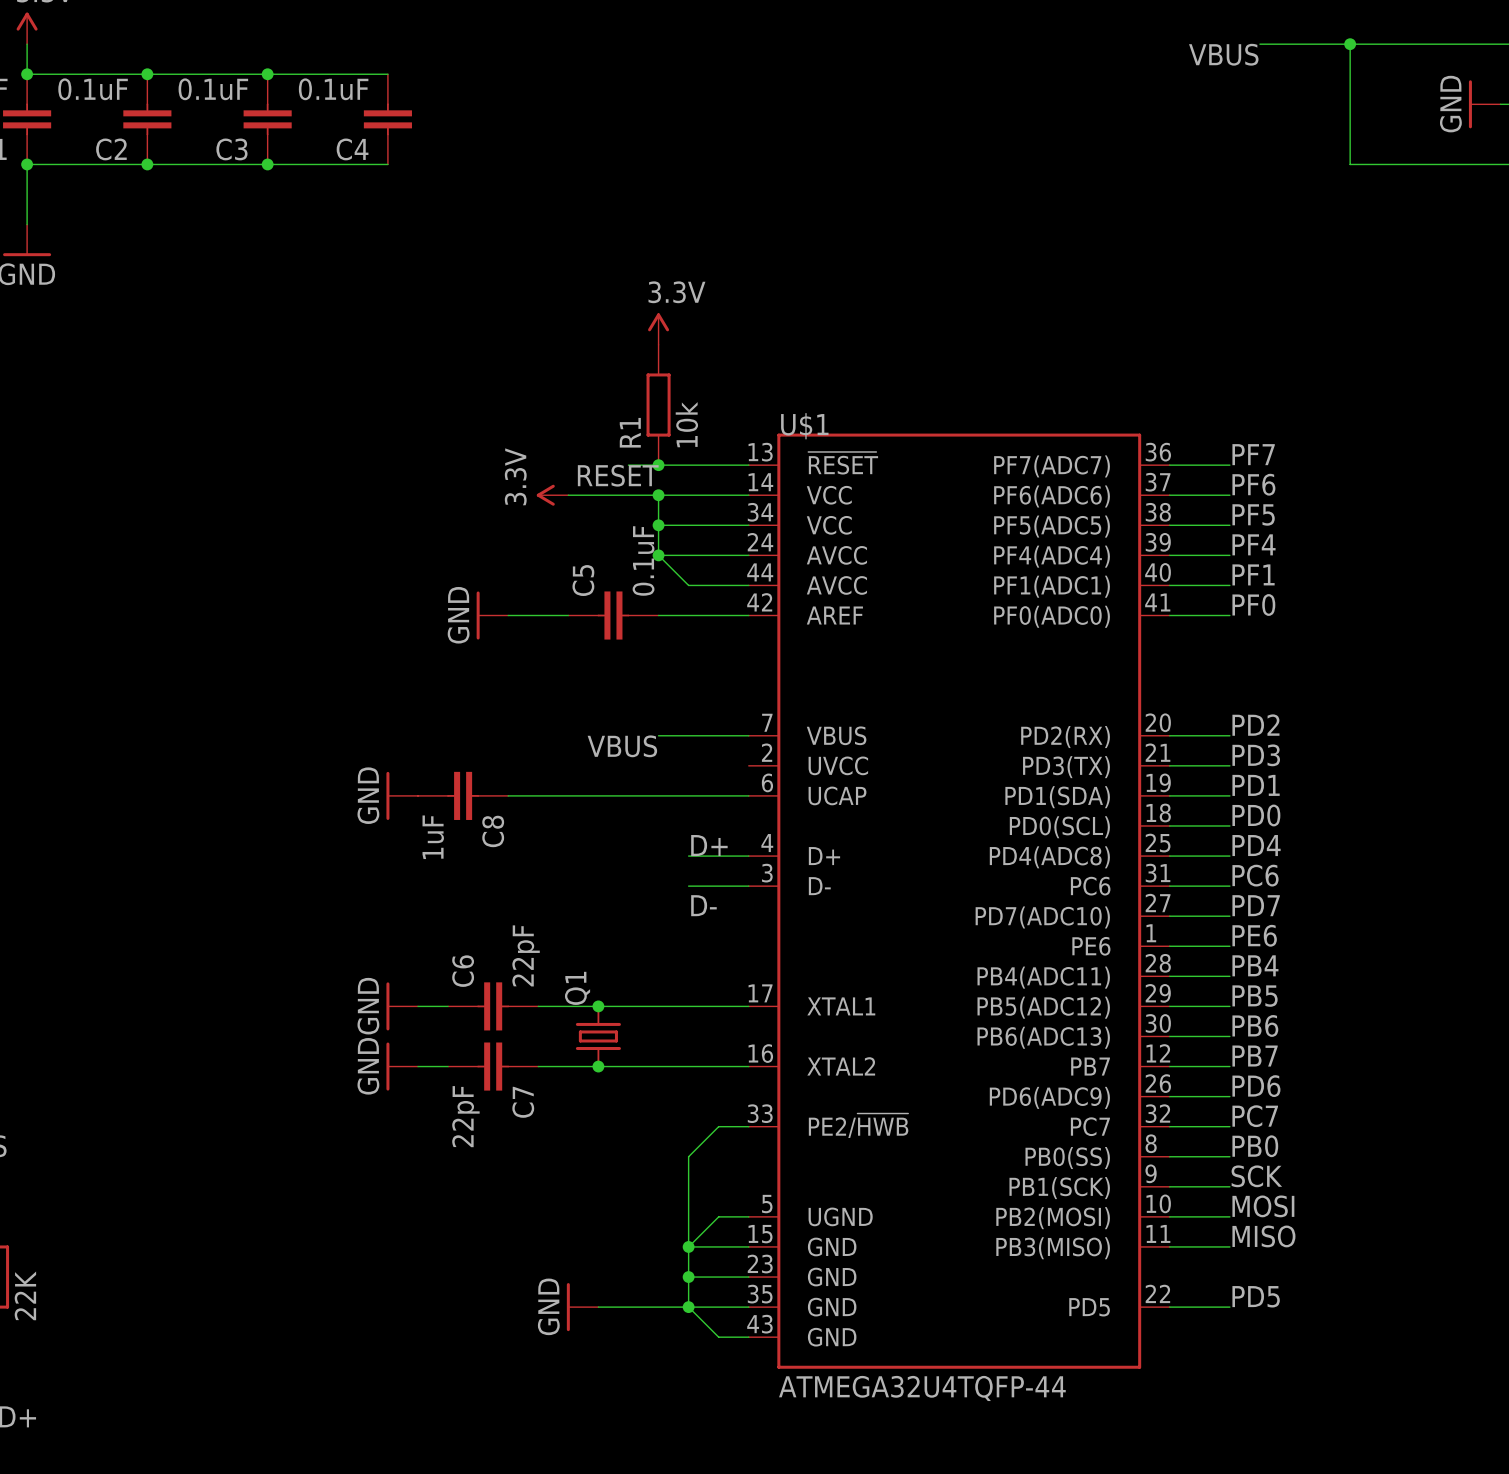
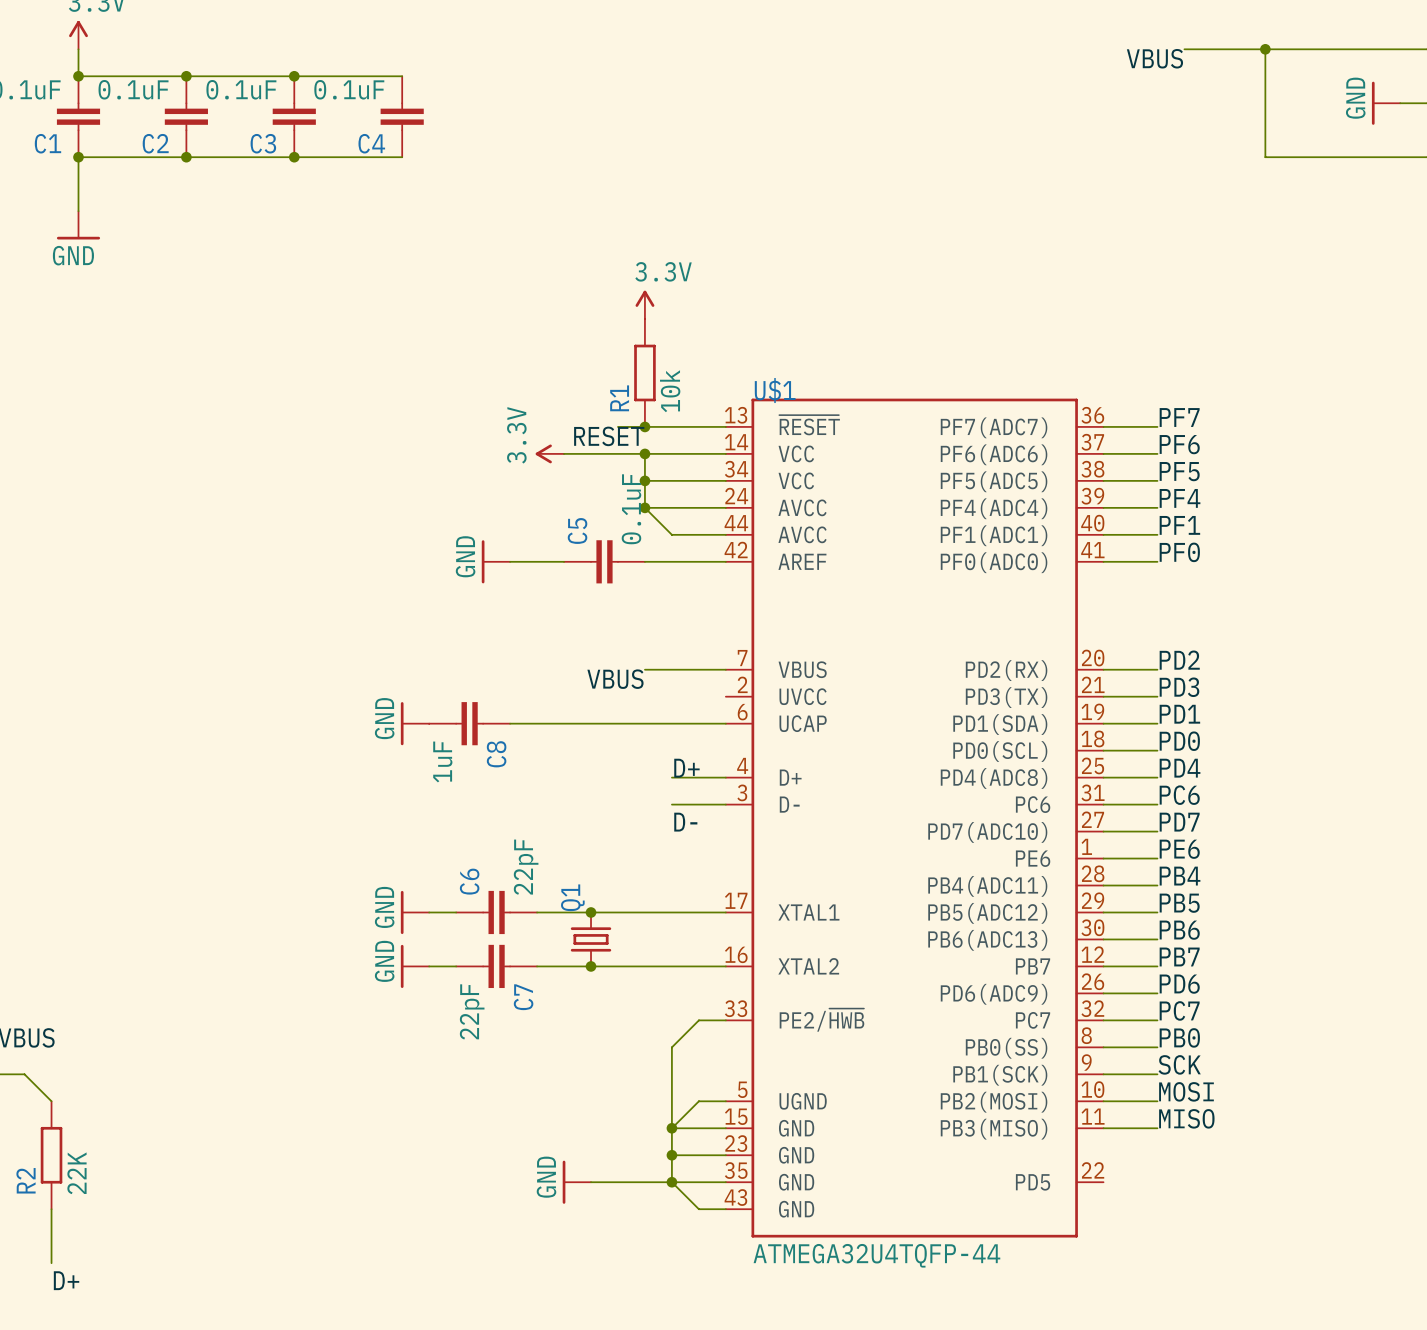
label: PD5 (1256, 1296) -> none
wire: (1169, 1307) (1229, 1307) -> none

